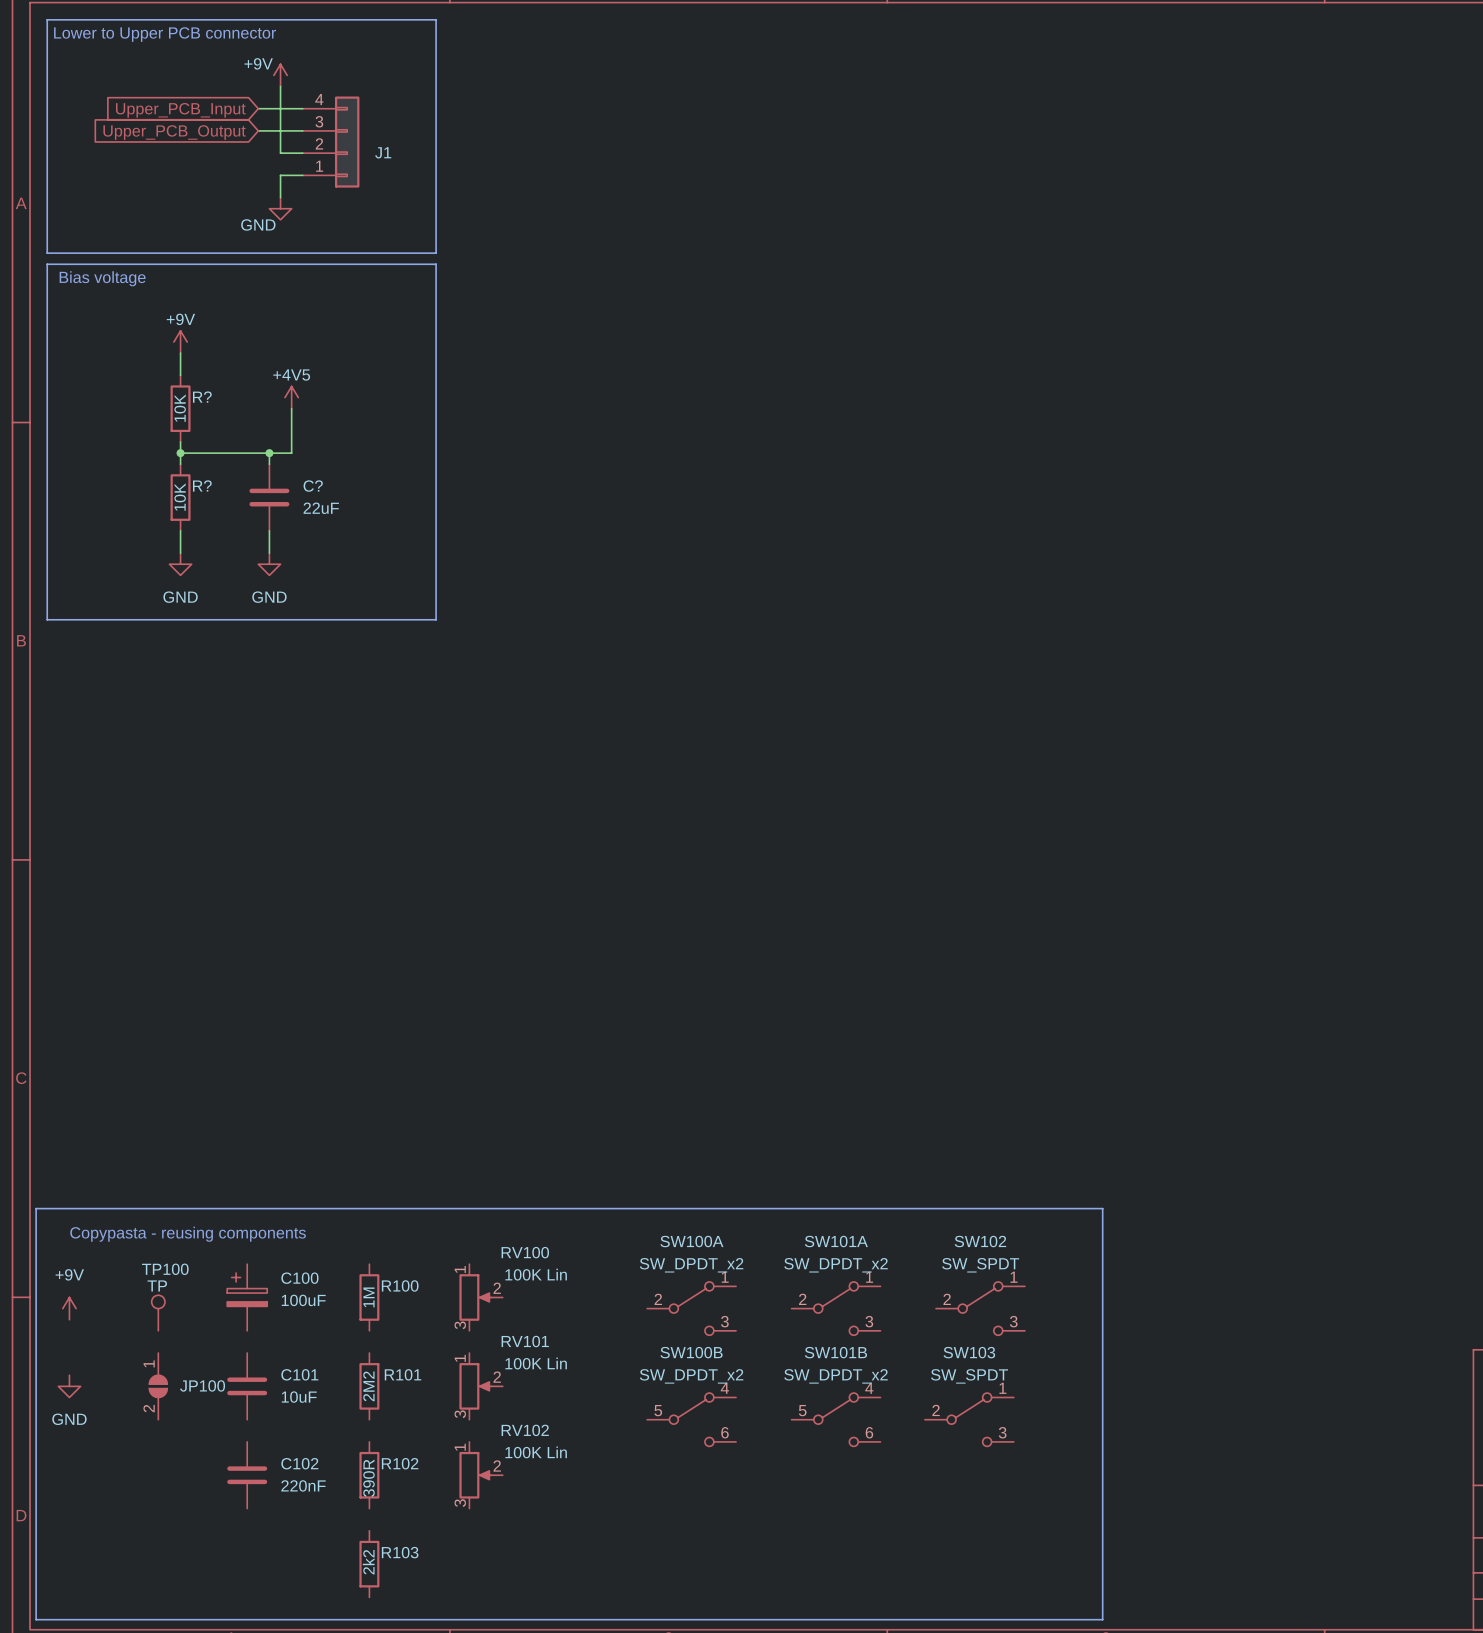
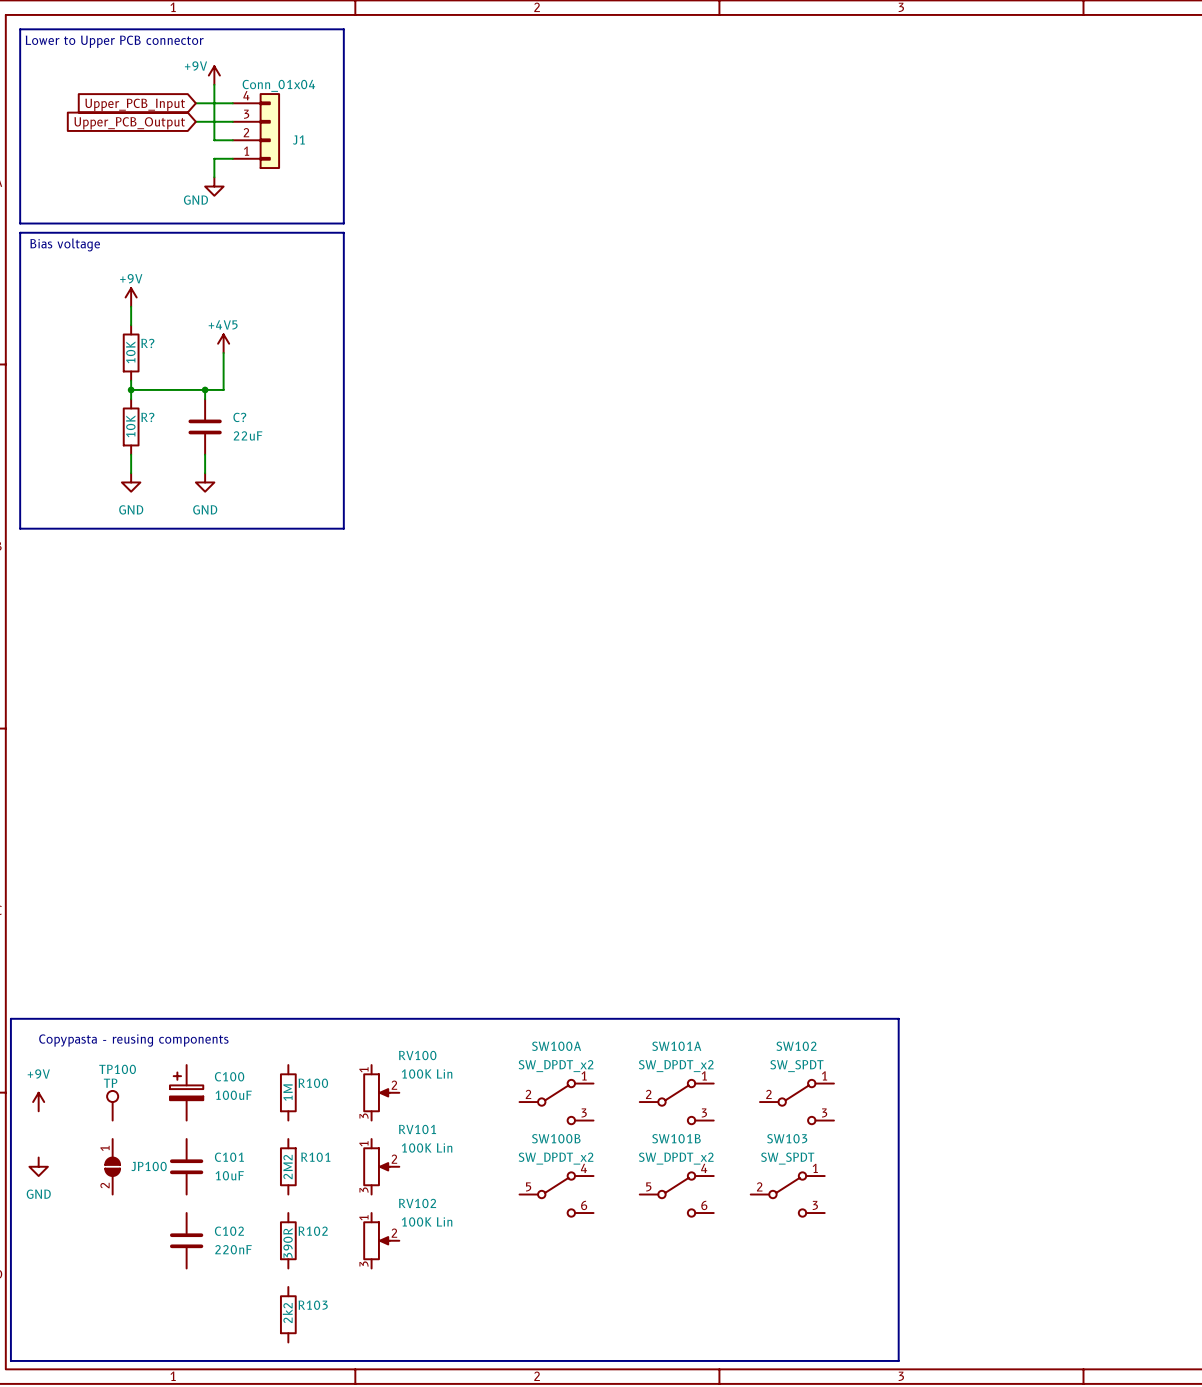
J1 value: none -> Conn_01x04 (278, 85)

